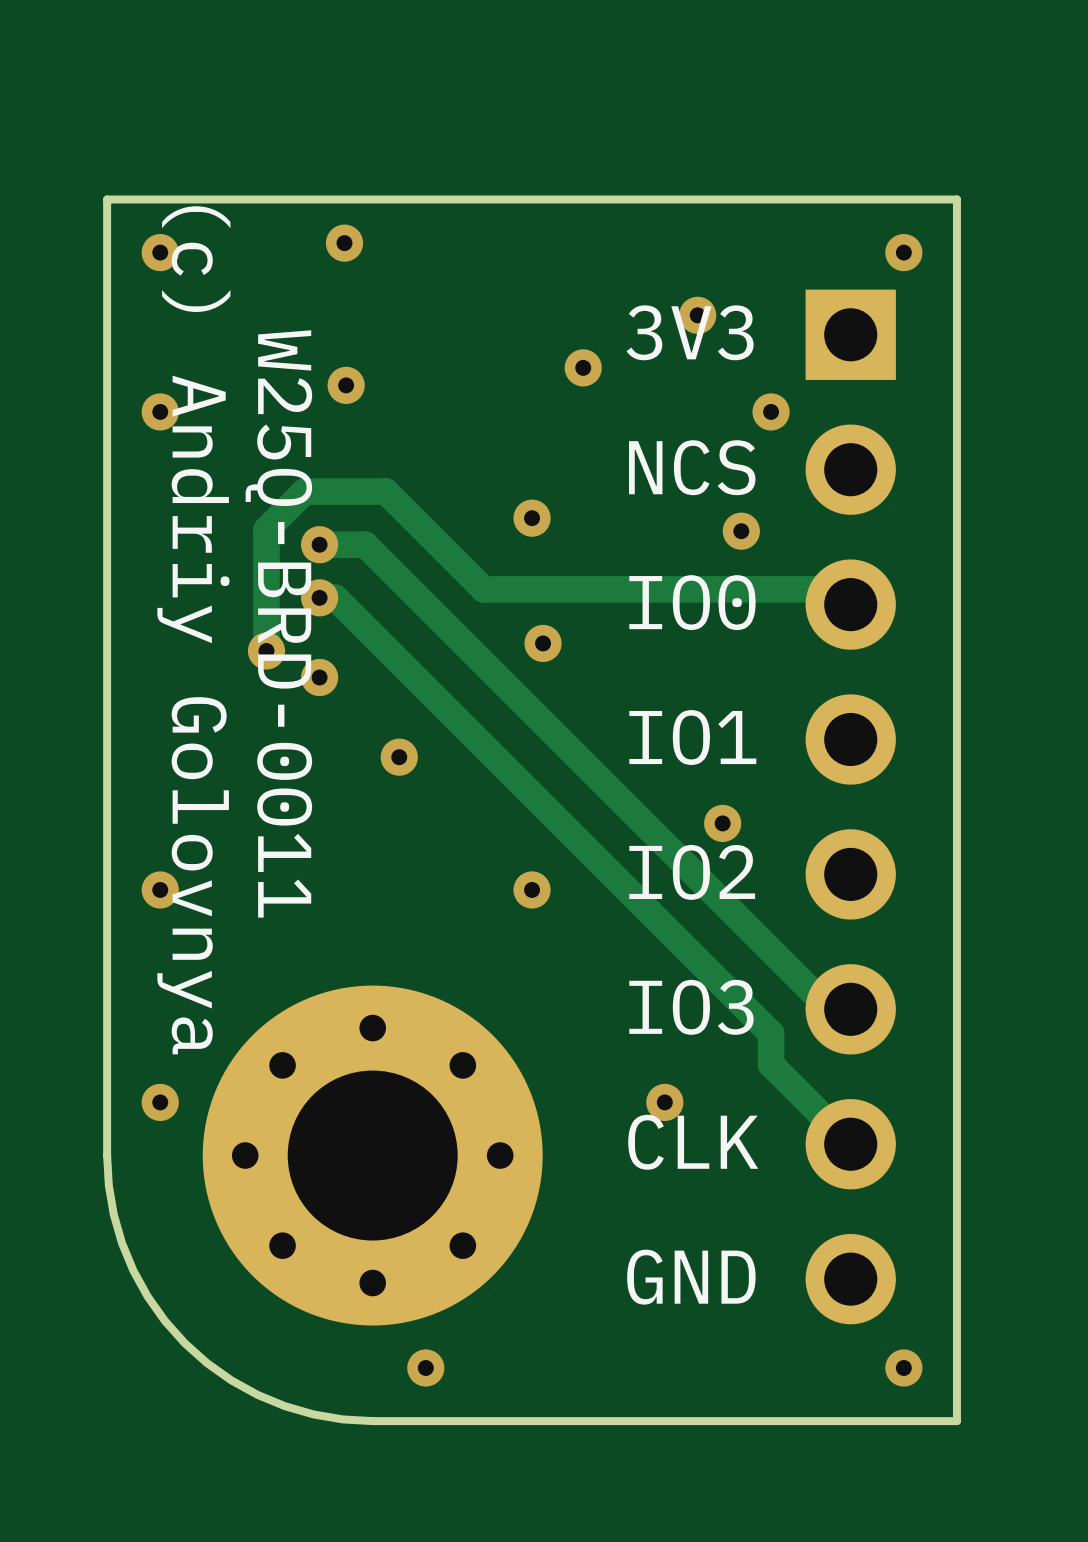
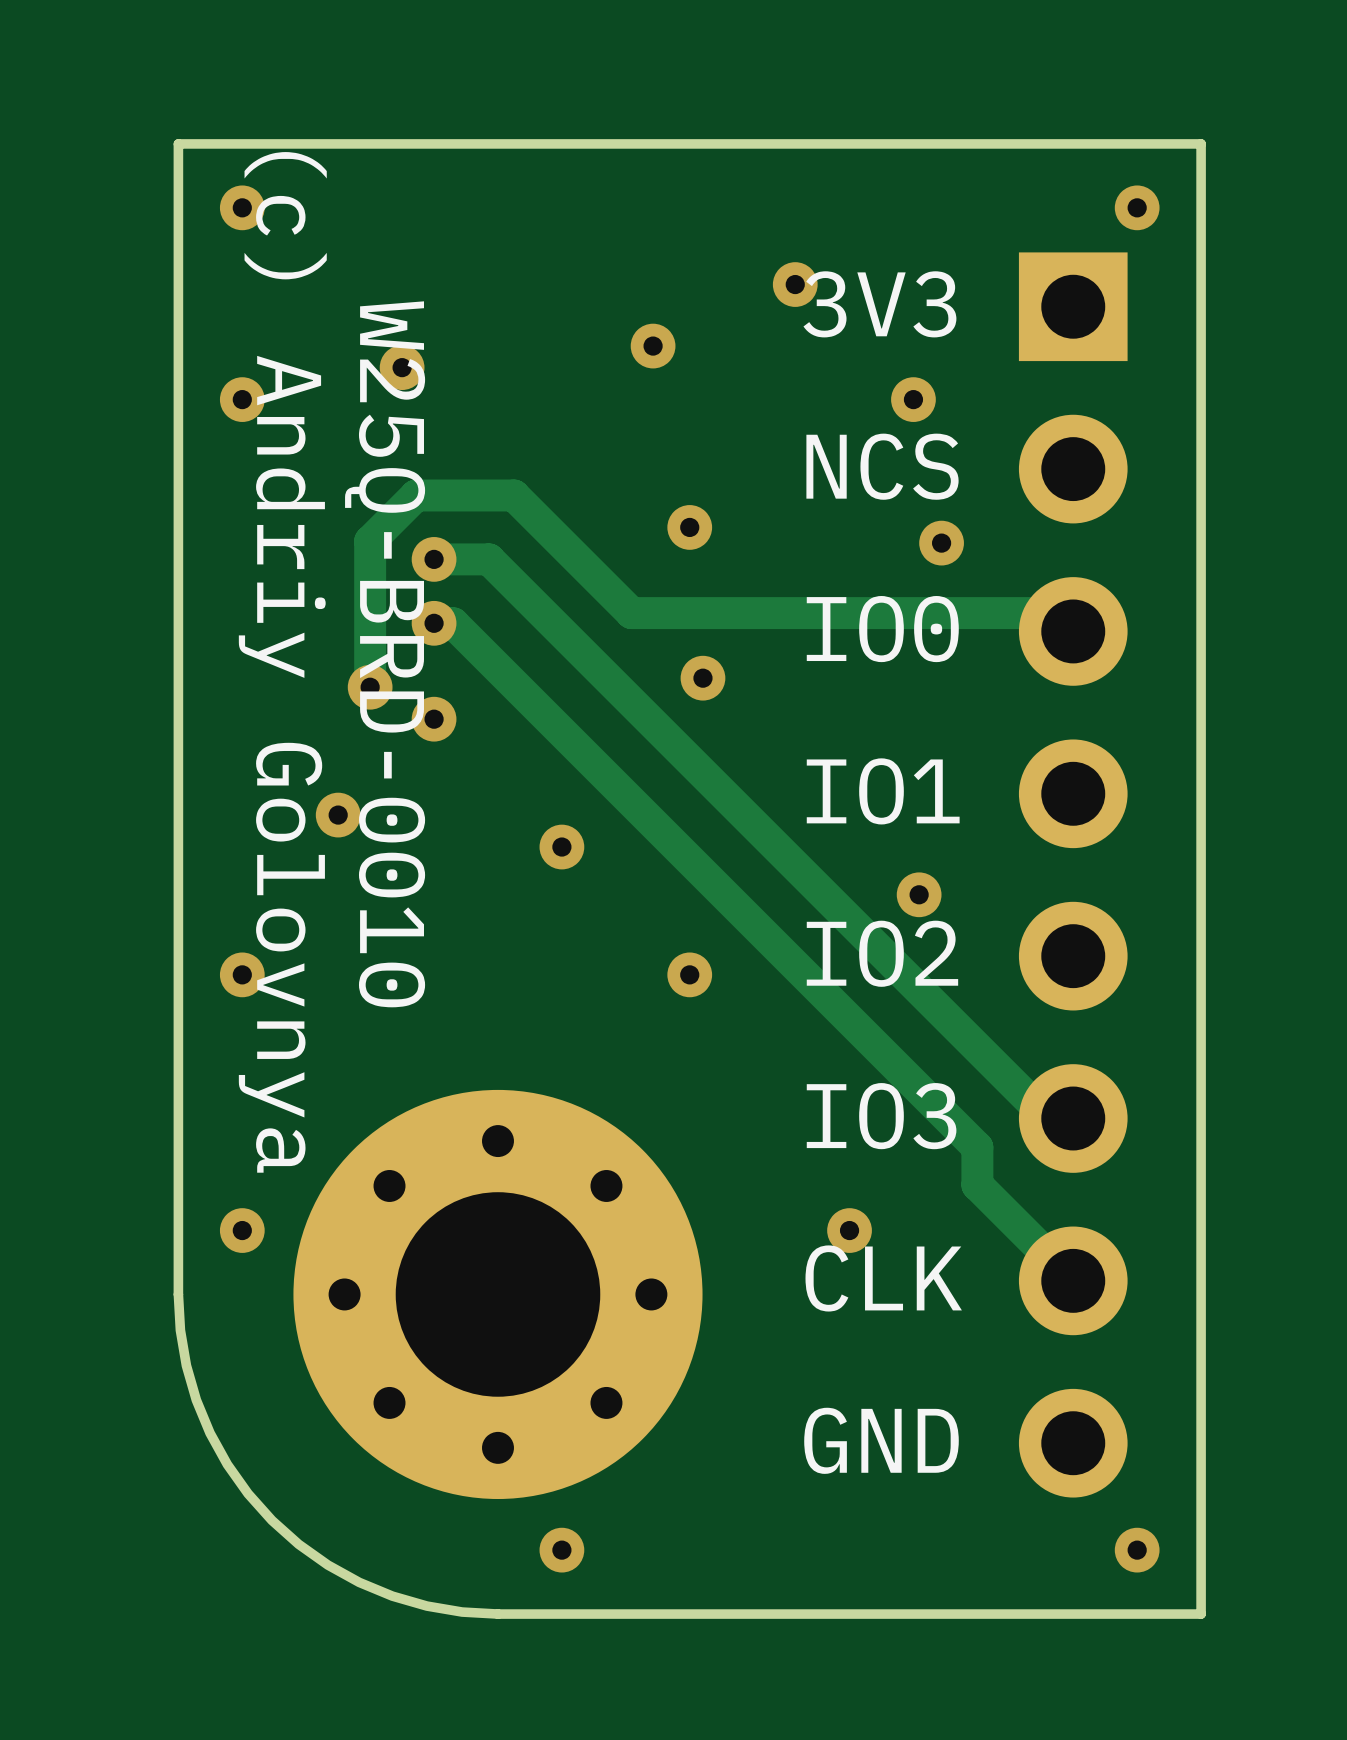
via: (344, 243) -> none
via: (697, 315) -> none
via: none -> (795, 284)
via: none -> (653, 346)
via: (583, 367) -> none
via position: (346, 385) -> (402, 367)
via: none -> (913, 399)
via: (771, 411) -> none
text: W25Q-BRD-0011 (278, 623) -> W25Q-BRD-0010 (385, 654)
via: none -> (338, 815)
via position: (399, 757) -> (561, 847)

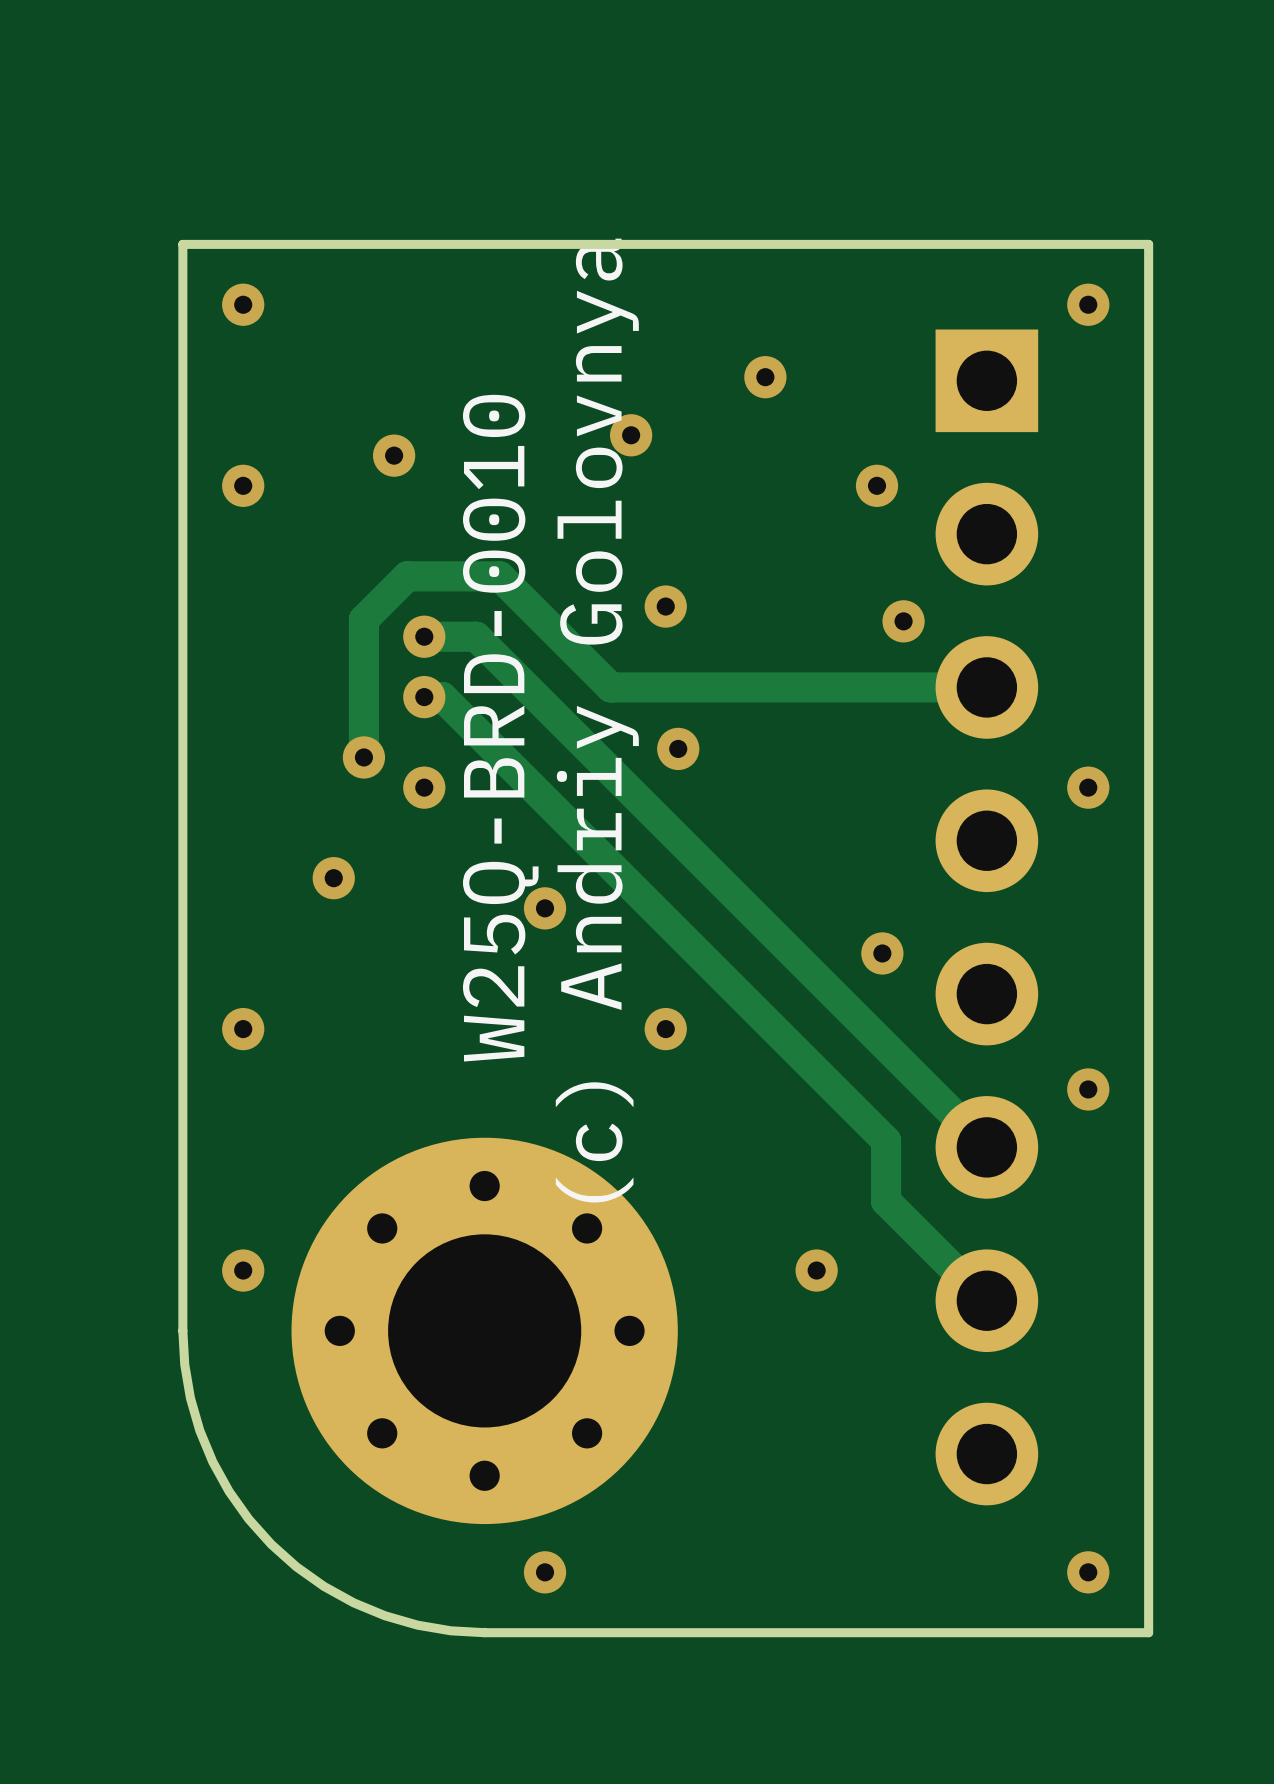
text: 3V3 (879, 304) -> none
text: NCS (882, 466) -> none
text: IO0 (882, 629) -> none
text rotation: 0° (385, 654) -> 180° (500, 728)
text rotation: 0° (282, 662) -> 180° (597, 720)
via: none -> (1088, 787)
text: IO1 (883, 791) -> none
part position: (1073, 874) -> (986, 917)
text: IO2 (882, 953) -> none
via: none -> (1088, 1089)
track: (923, 1093) (977, 1147) (977, 1184) (1073, 1280) -> (886, 1140) (886, 1201) (985, 1300)
text: IO3 (881, 1116) -> none
text: CLK (883, 1278) -> none
text: GND (881, 1440) -> none

